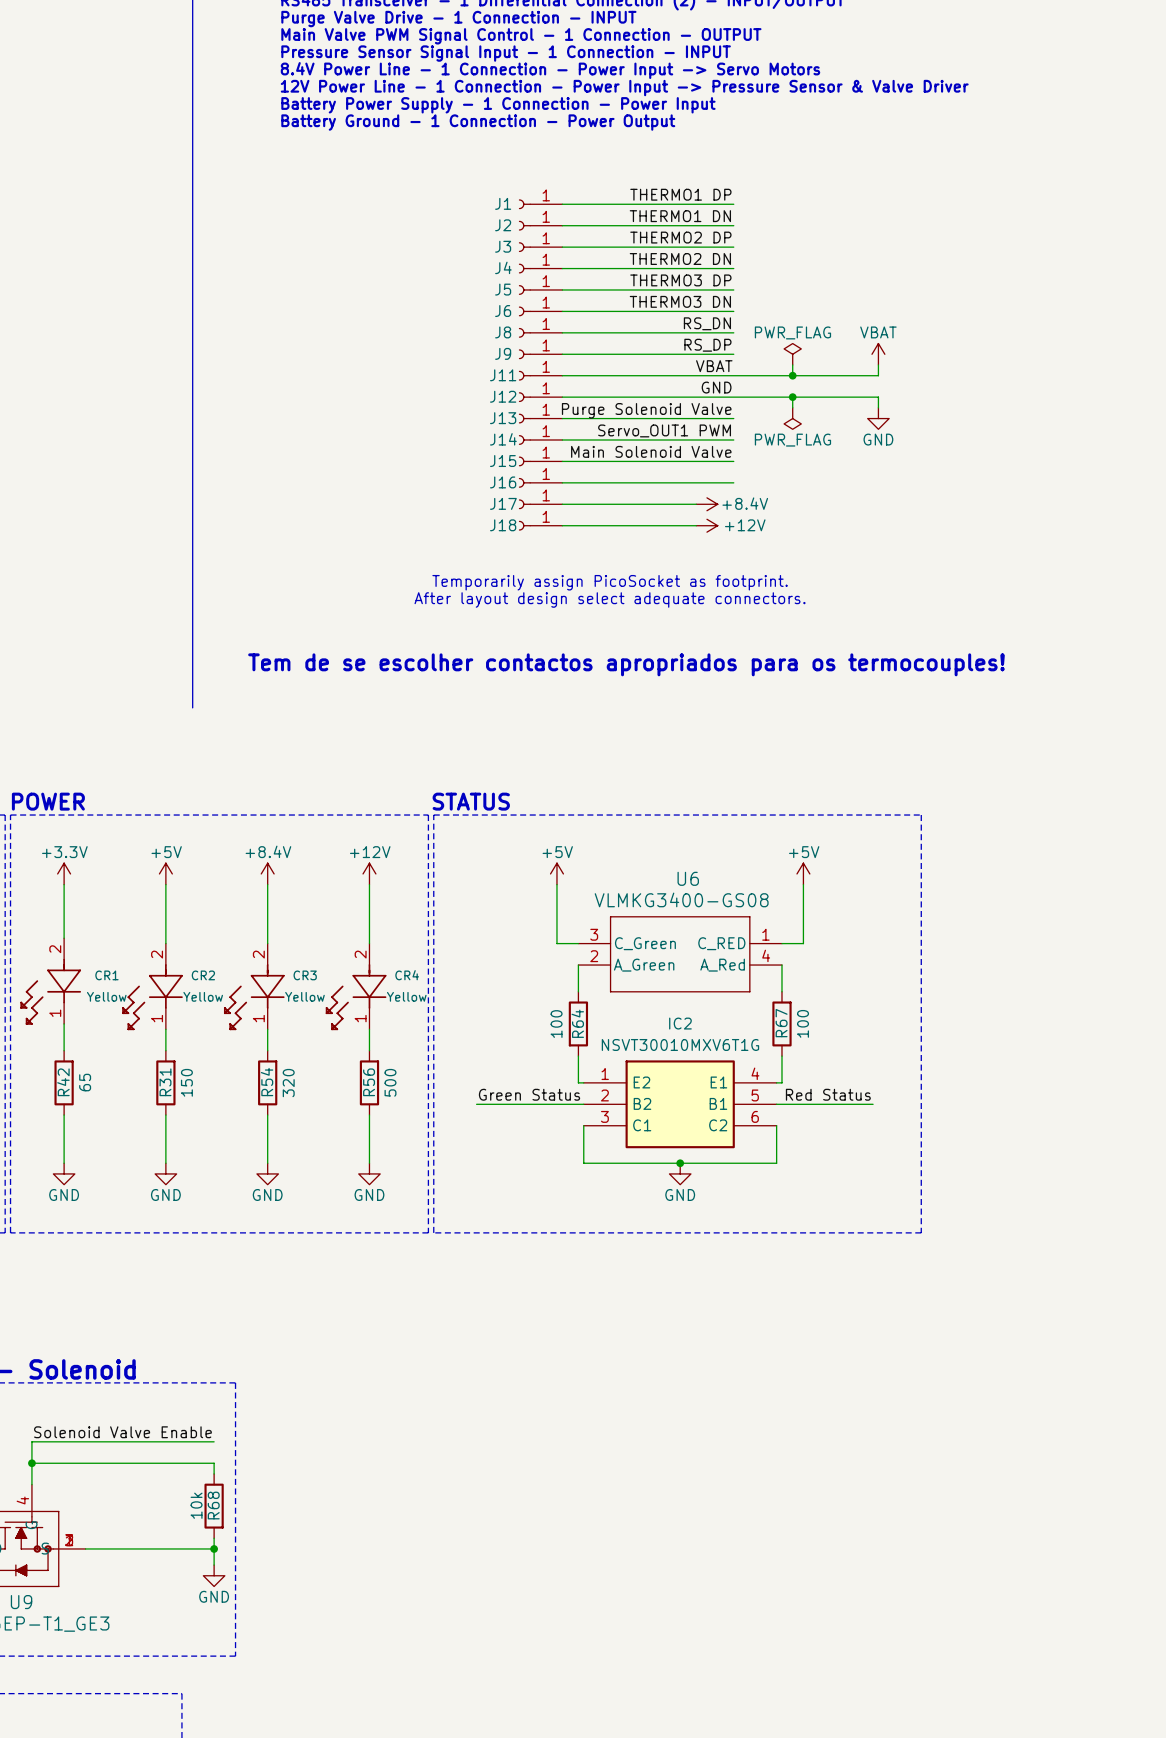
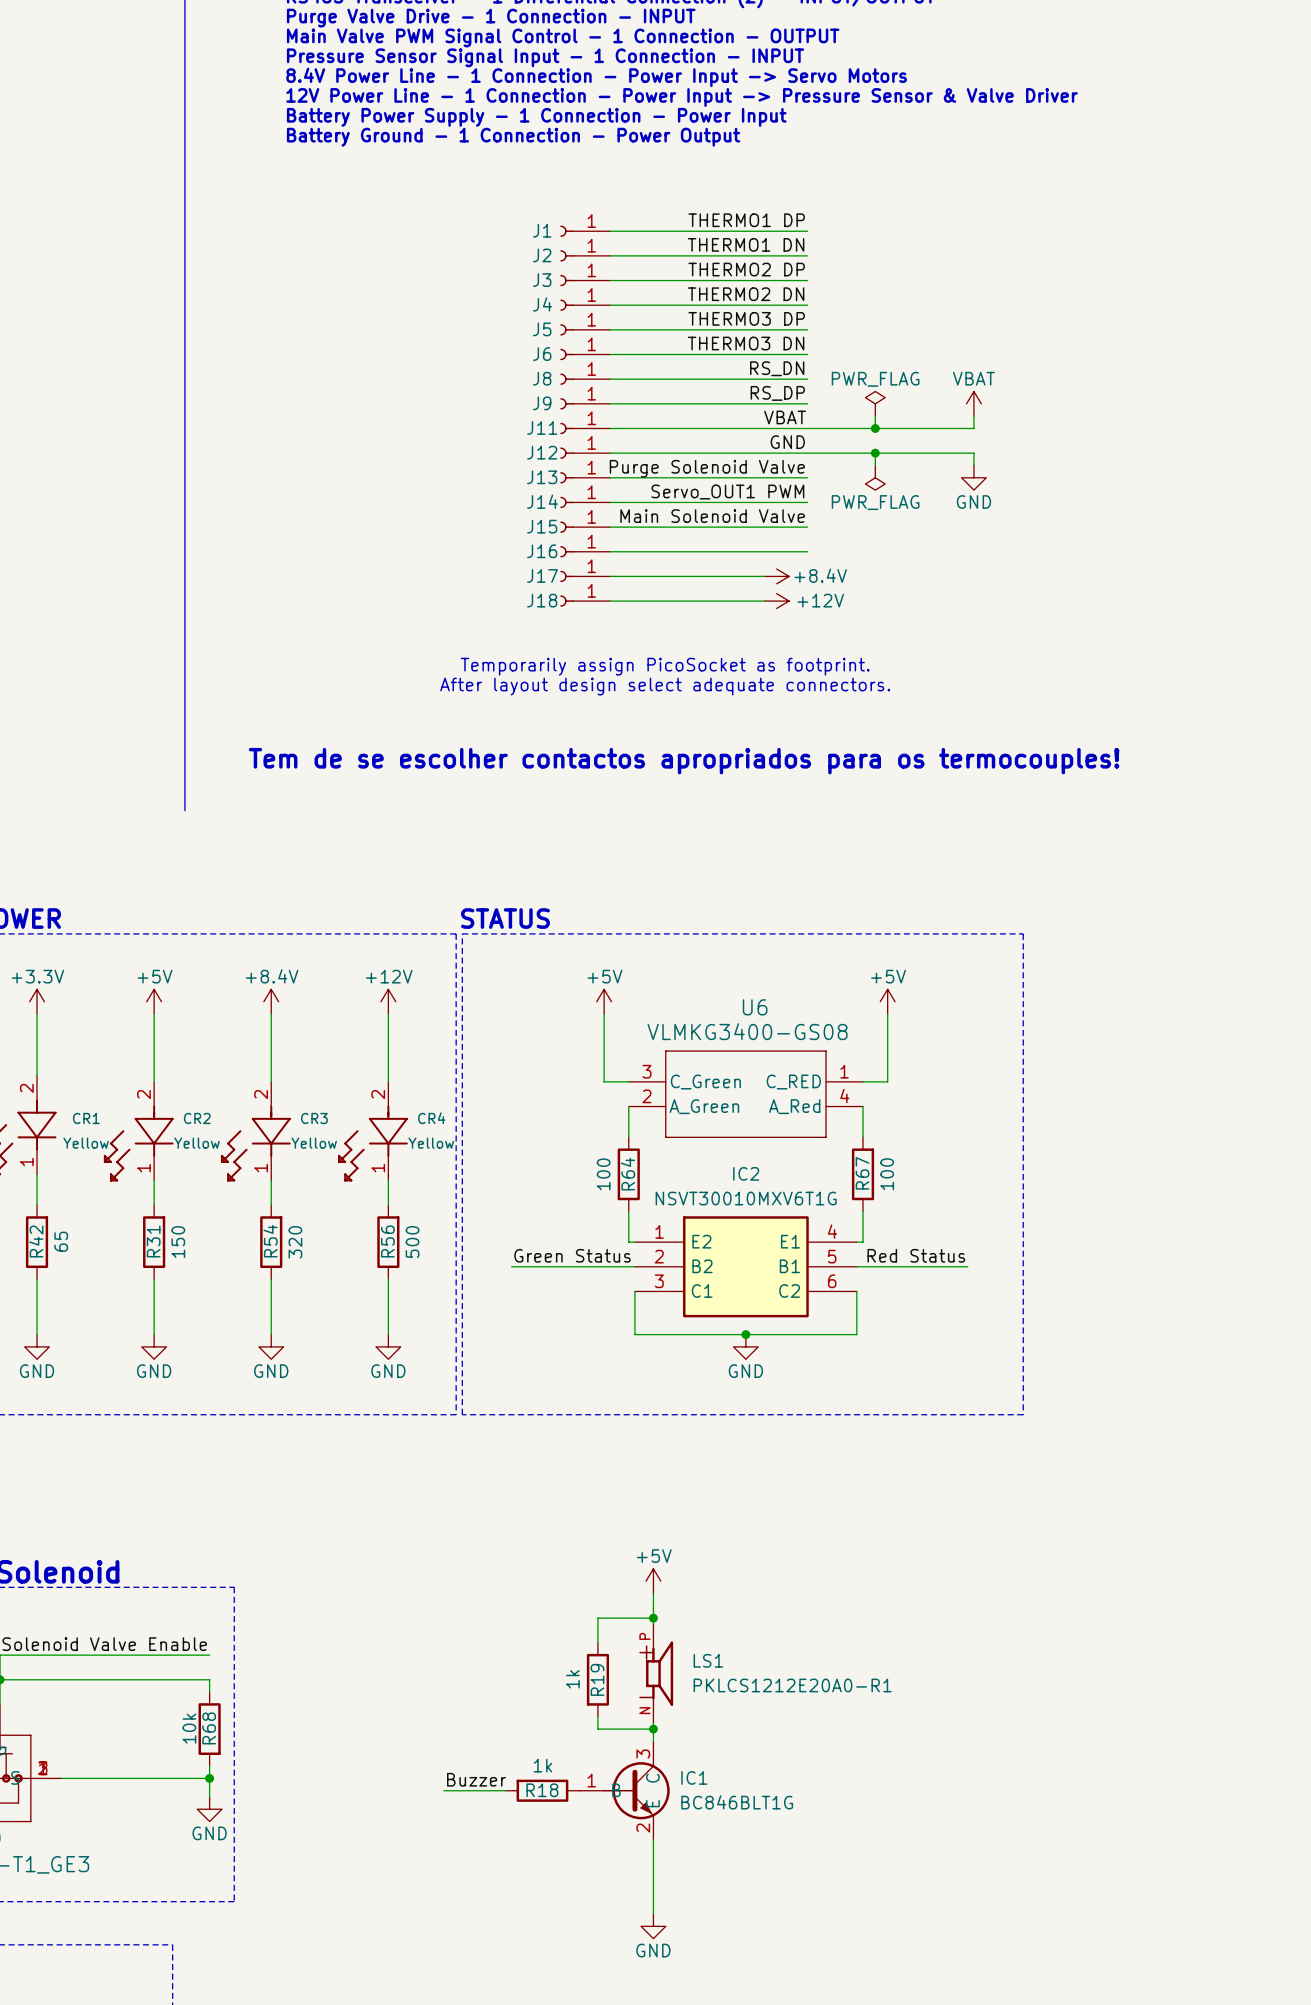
power symbol: none -> +5V (653, 1581)
wire: none -> (653, 1593) (653, 1624)
wire: none -> (653, 1618) (597, 1618) (597, 1642)
junction: none -> (653, 1618)
LS1: none -> PKLCS1212E20A0-R1 (659, 1673)
R19: none -> 1k (597, 1679)
wire: none -> (597, 1716) (597, 1729) (653, 1729)
wire: none -> (653, 1722) (653, 1741)
junction: none -> (653, 1729)
label: none -> Buzzer (476, 1779)
wire: none -> (443, 1790) (505, 1790)
R18: none -> 1k (542, 1790)
IC1: none -> BC846BLT1G (624, 1790)
wire: none -> (653, 1840) (653, 1914)
power symbol: none -> GND (653, 1926)

